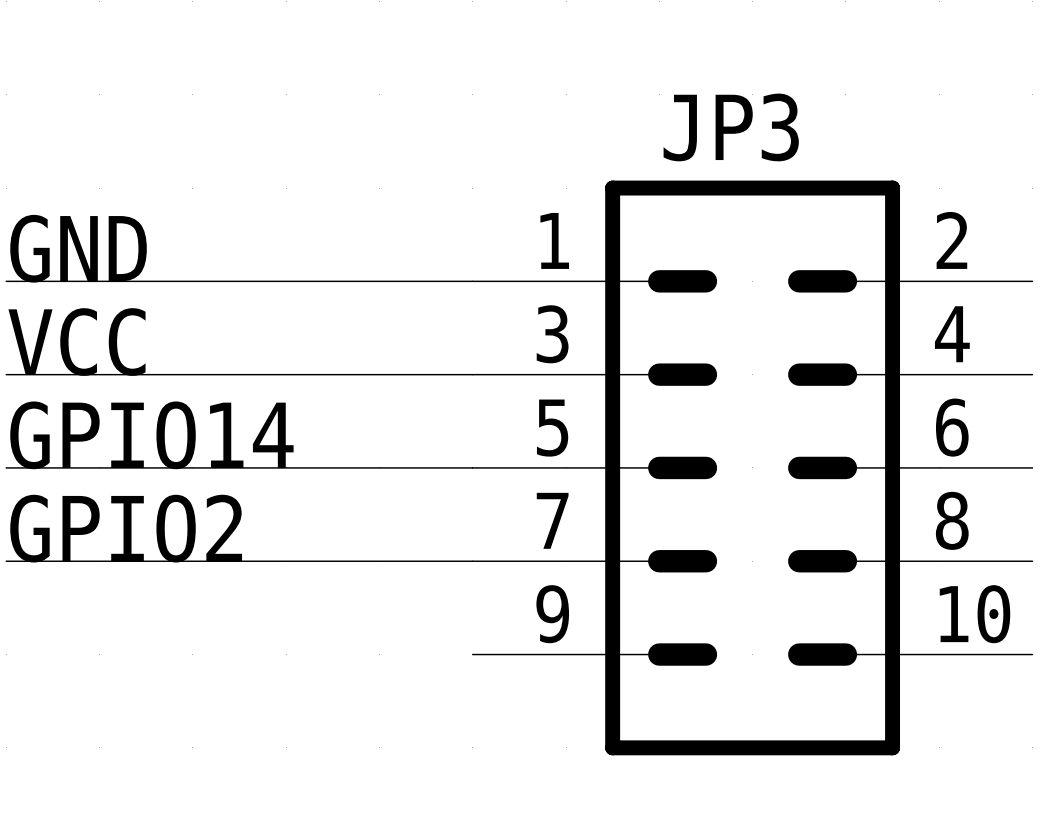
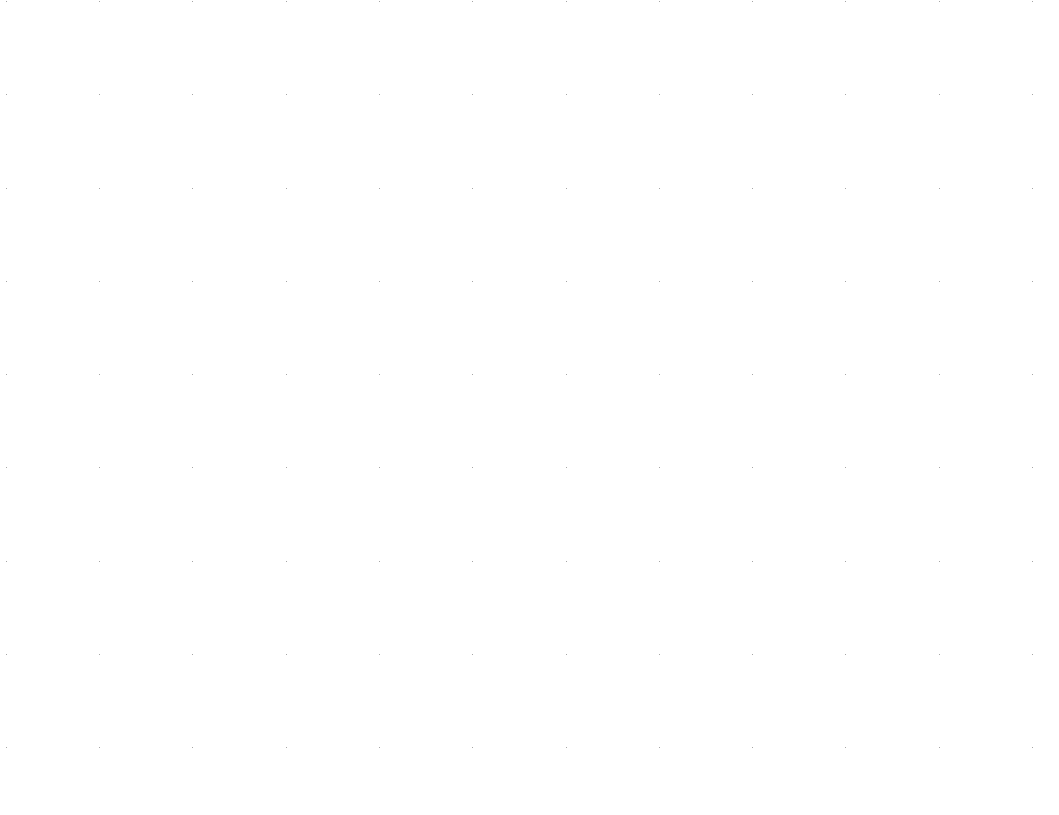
label: GND (78, 248) -> none
wire: (6, 281) (472, 281) -> none
label: VCC (77, 342) -> none
wire: (6, 374) (472, 374) -> none
label: GPIO14 (151, 435) -> none
wire: (6, 467) (472, 467) -> none
JP3: (752, 467) -> none
label: GPIO2 (126, 528) -> none
wire: (6, 561) (472, 561) -> none

